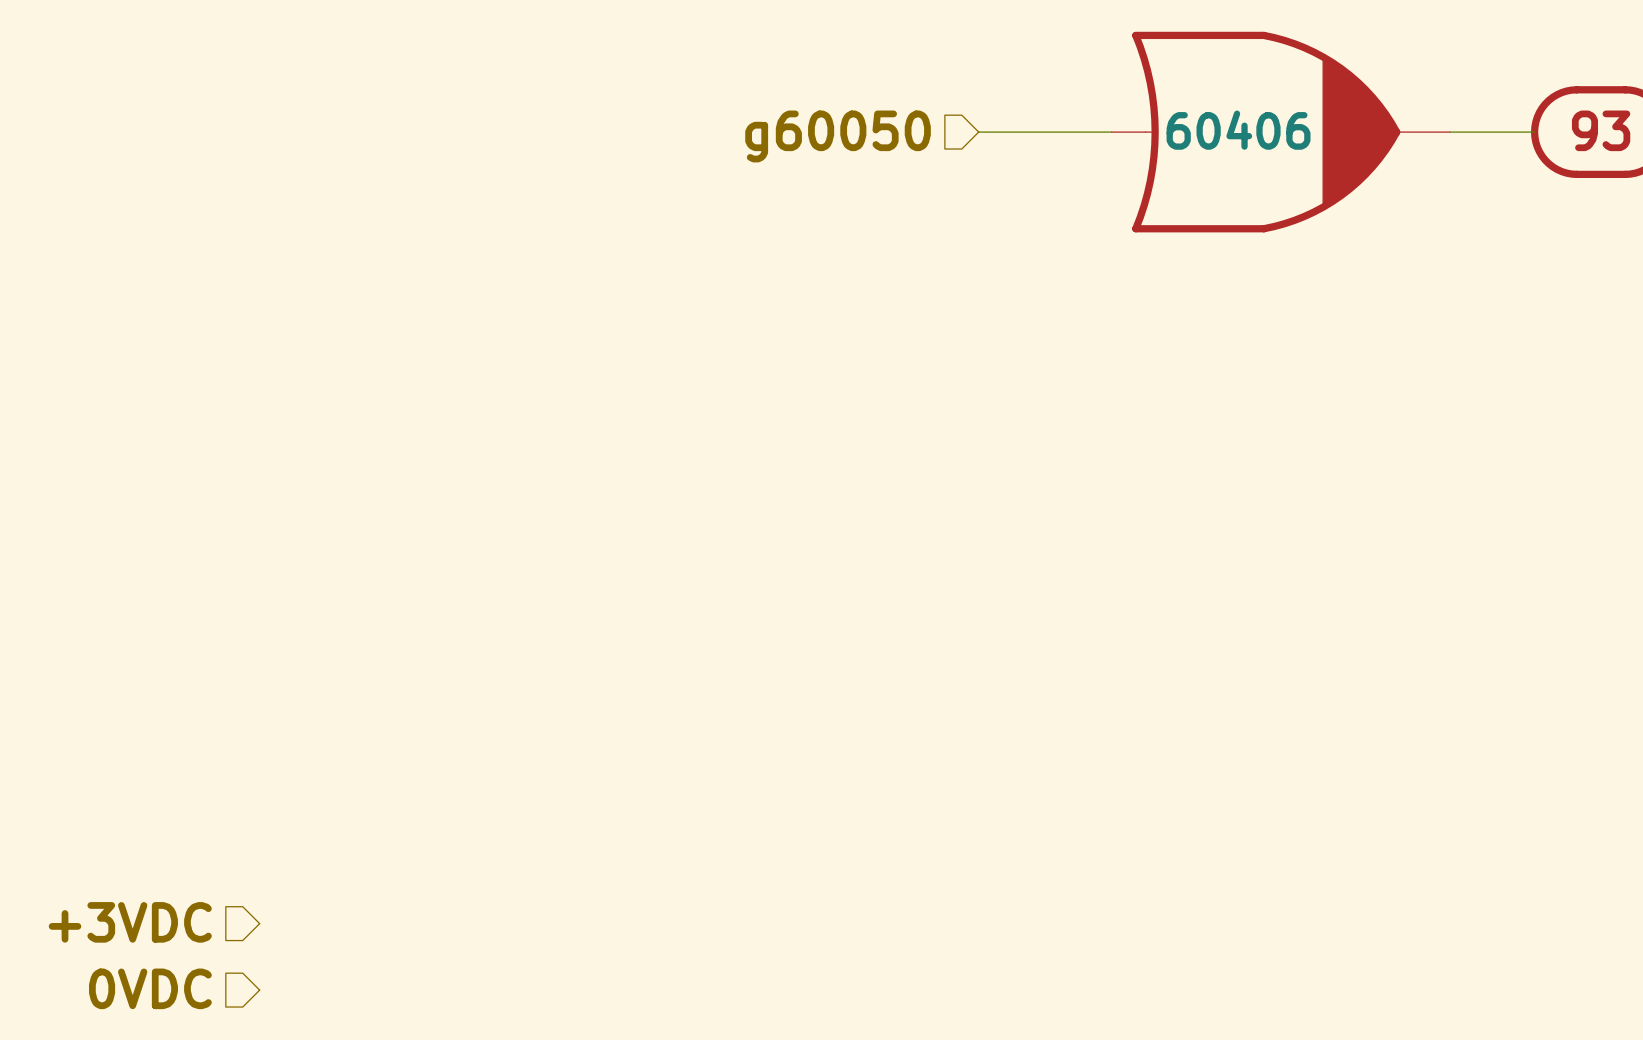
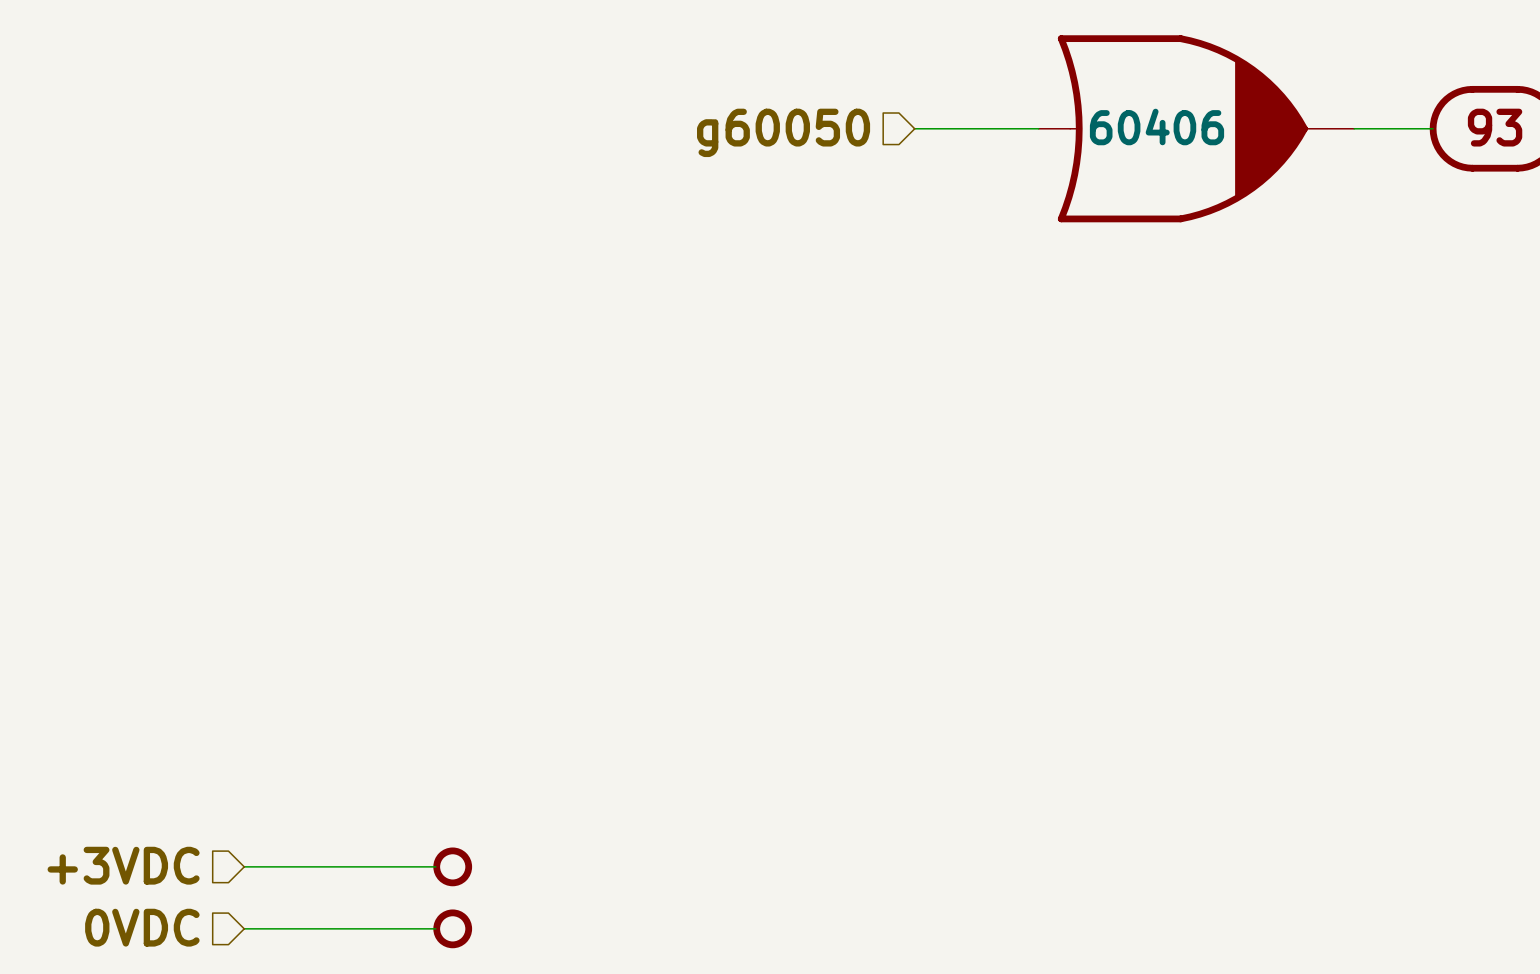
wire: none -> (244, 866) (435, 866)
part: none -> (452, 866)
wire: none -> (244, 928) (435, 928)
part: none -> (452, 928)

